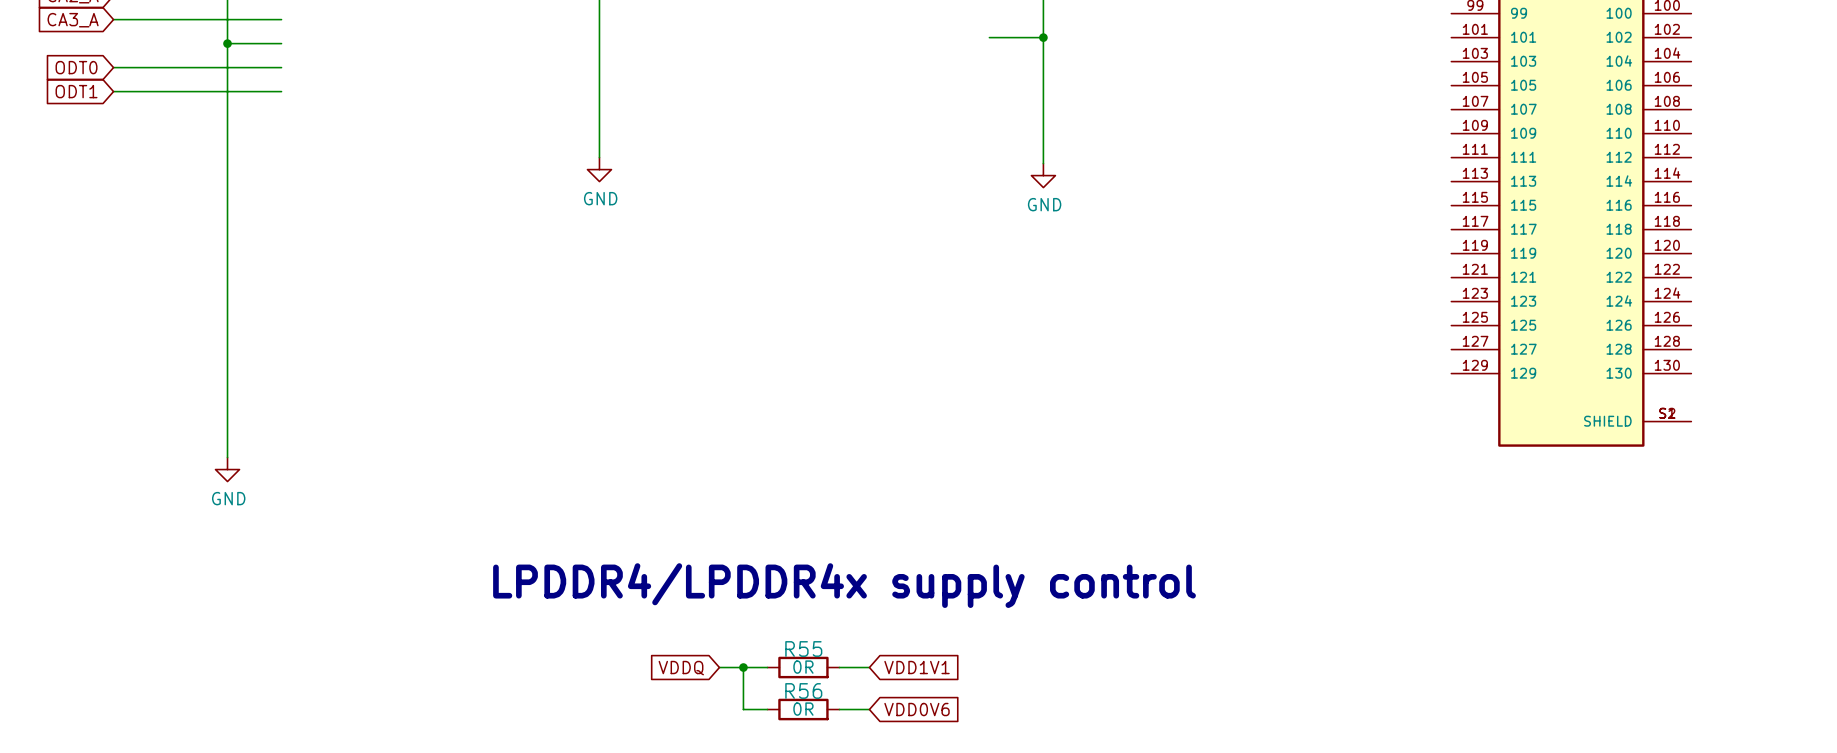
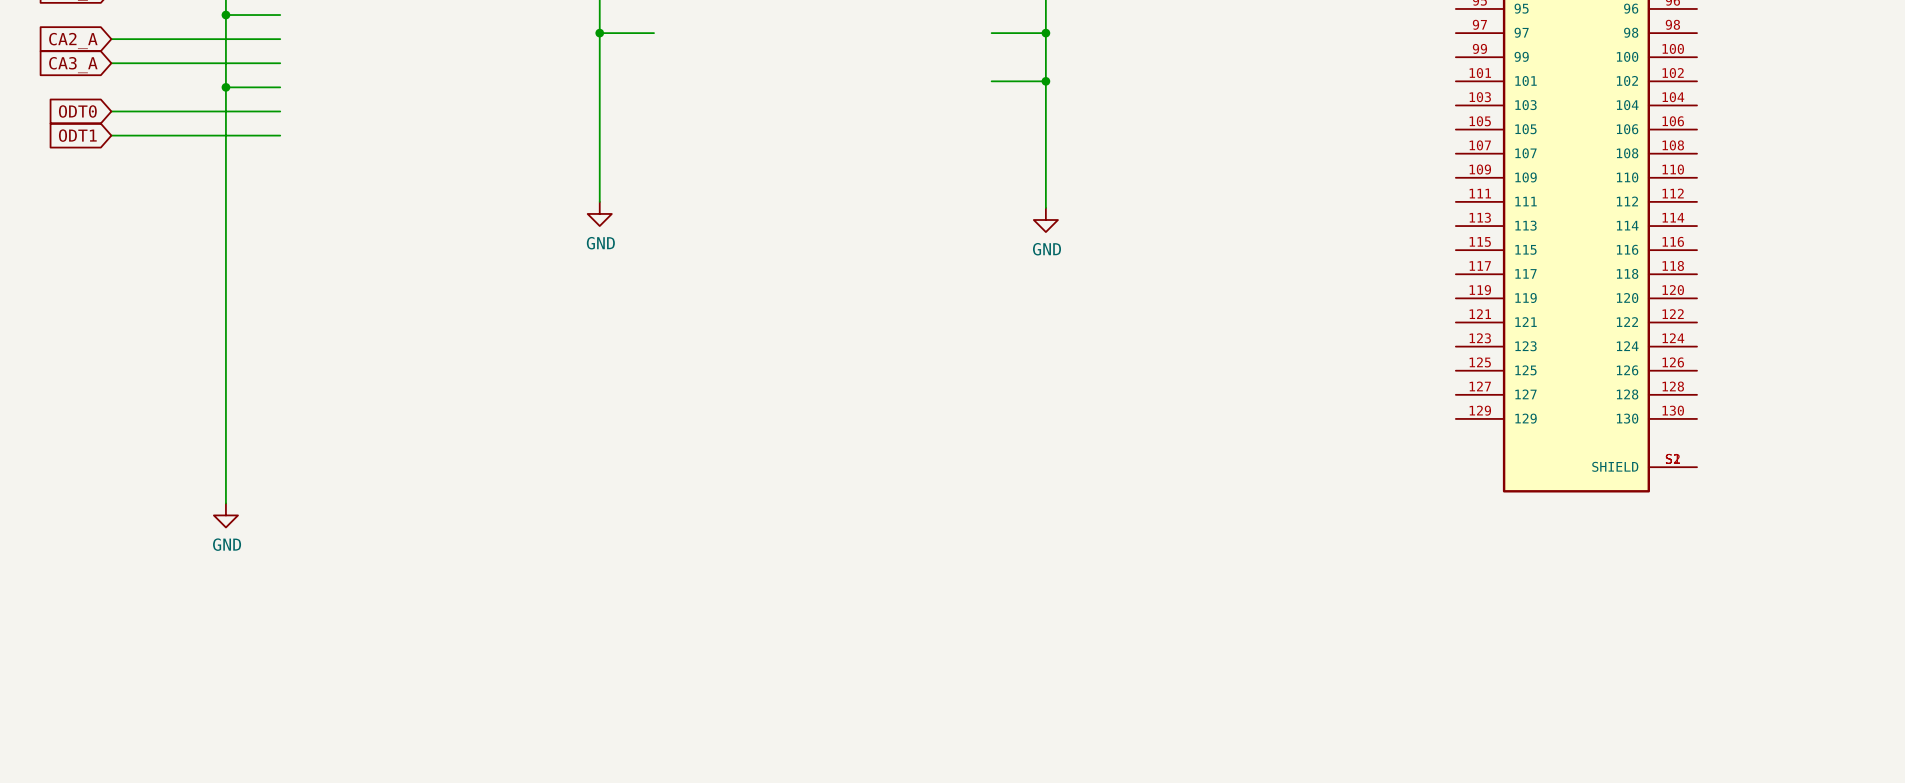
text: LPDDR4/LPDDR4x supply control (844, 585) -> none
wire: (719, 667) (767, 667) -> none
wire: (743, 667) (743, 709) (767, 709) -> none
junction: (743, 667) -> none
R55: (803, 667) -> none
wire: (839, 667) (869, 667) -> none
global label: VDD1V1 (917, 667) -> none
global label: VDDQ (681, 668) -> none
R56: (803, 709) -> none
wire: (839, 709) (869, 709) -> none
global label: VDD0V6 (917, 709) -> none

